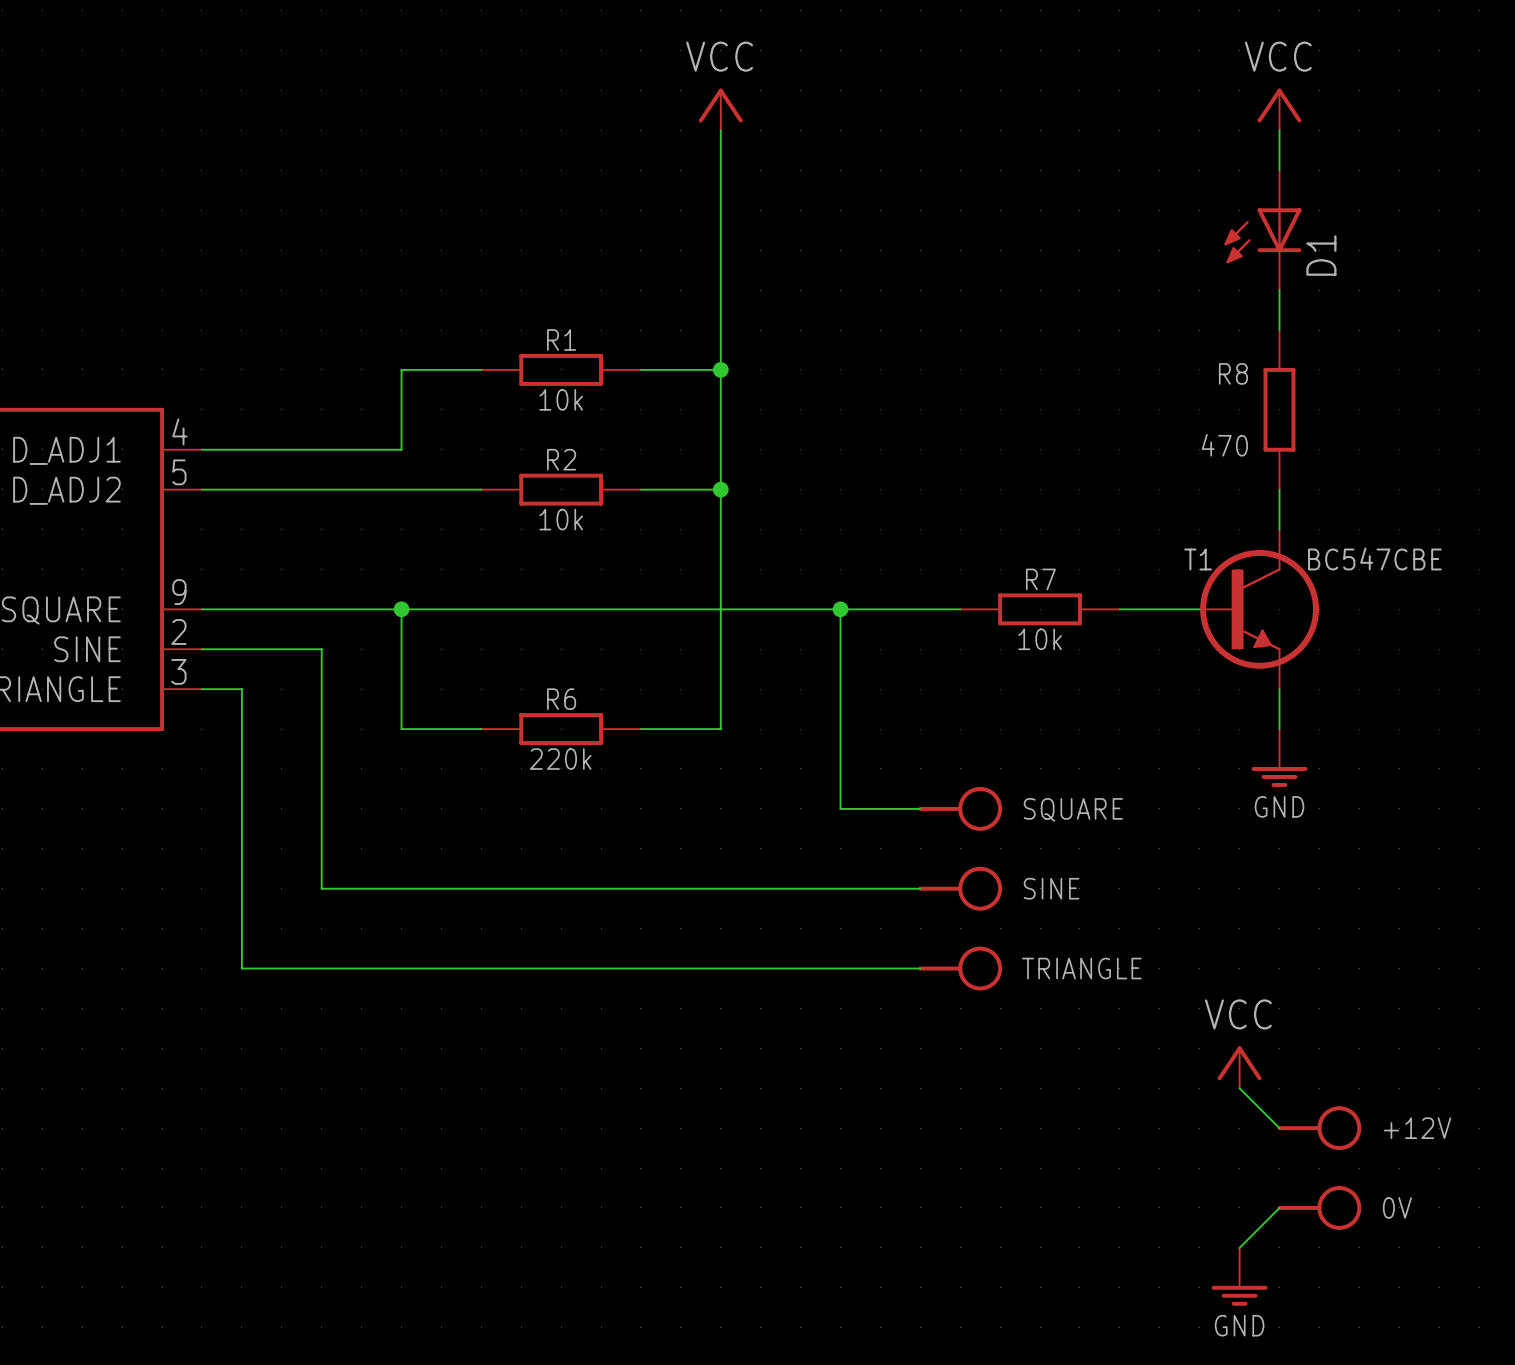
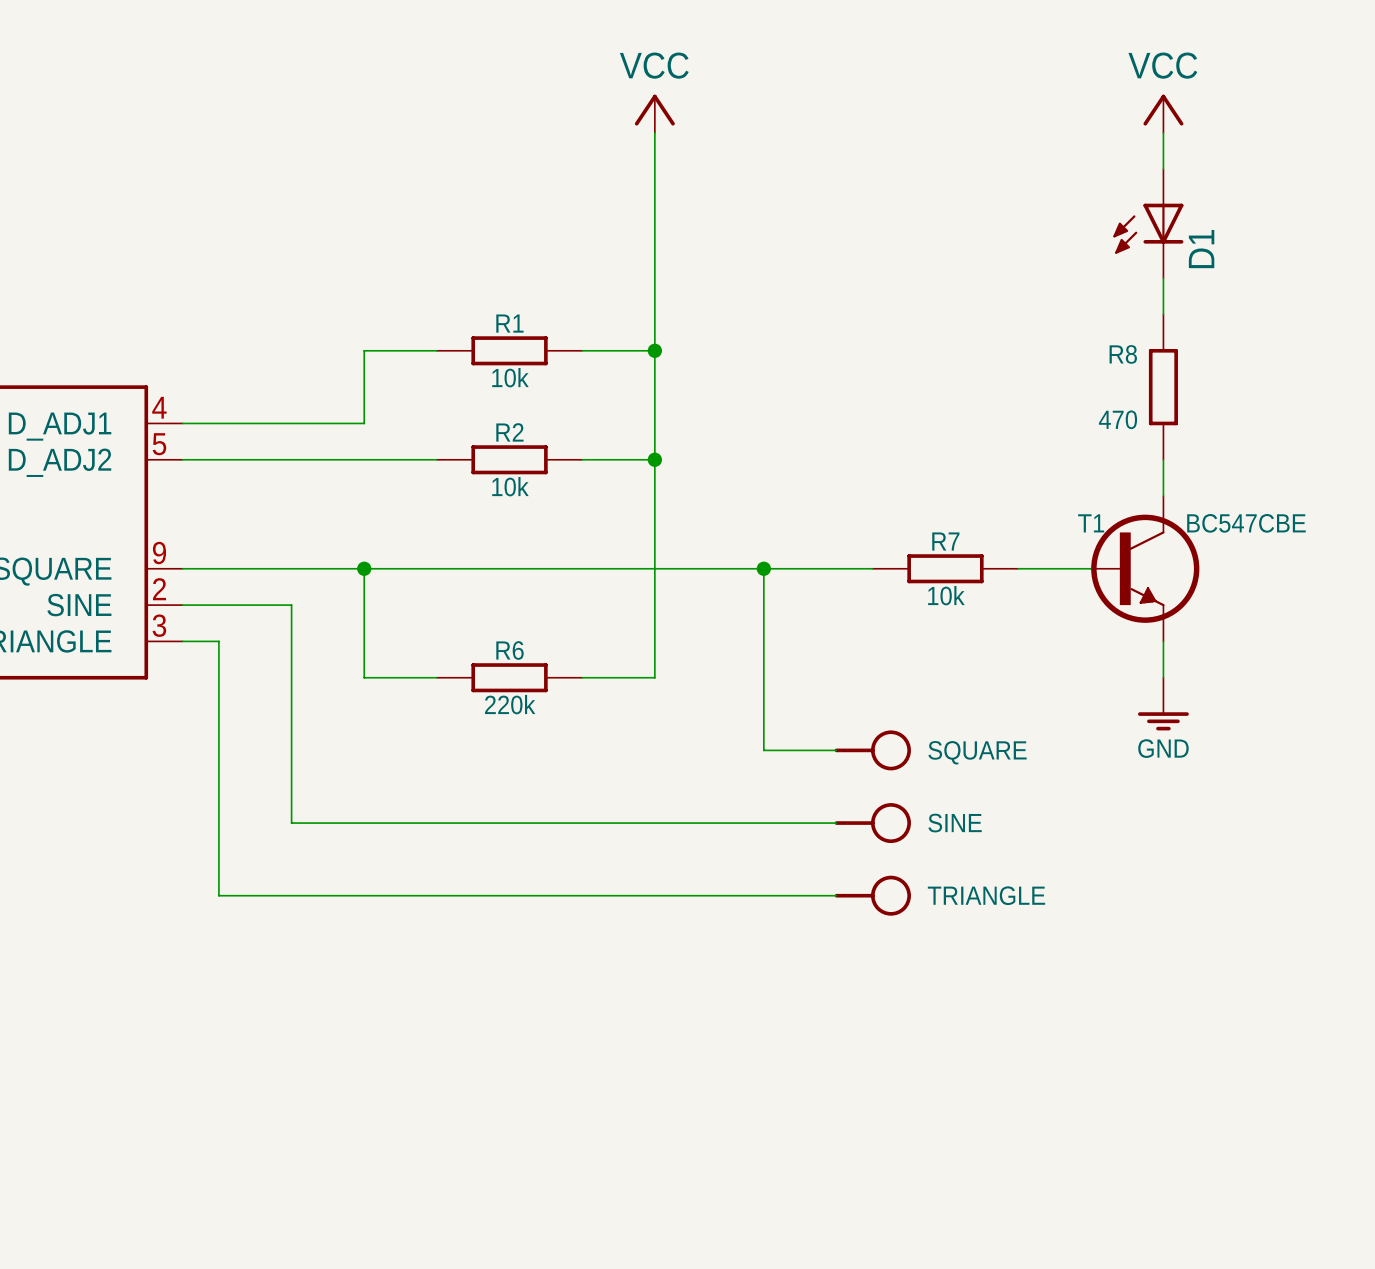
power symbol: VCC (1239, 1067) -> none
wire: (1239, 1088) (1279, 1128) -> none
+12V: (1319, 1128) -> none
wire: (1279, 1207) (1239, 1247) -> none
0V: (1319, 1207) -> none
power symbol: GND (1239, 1276) -> none

